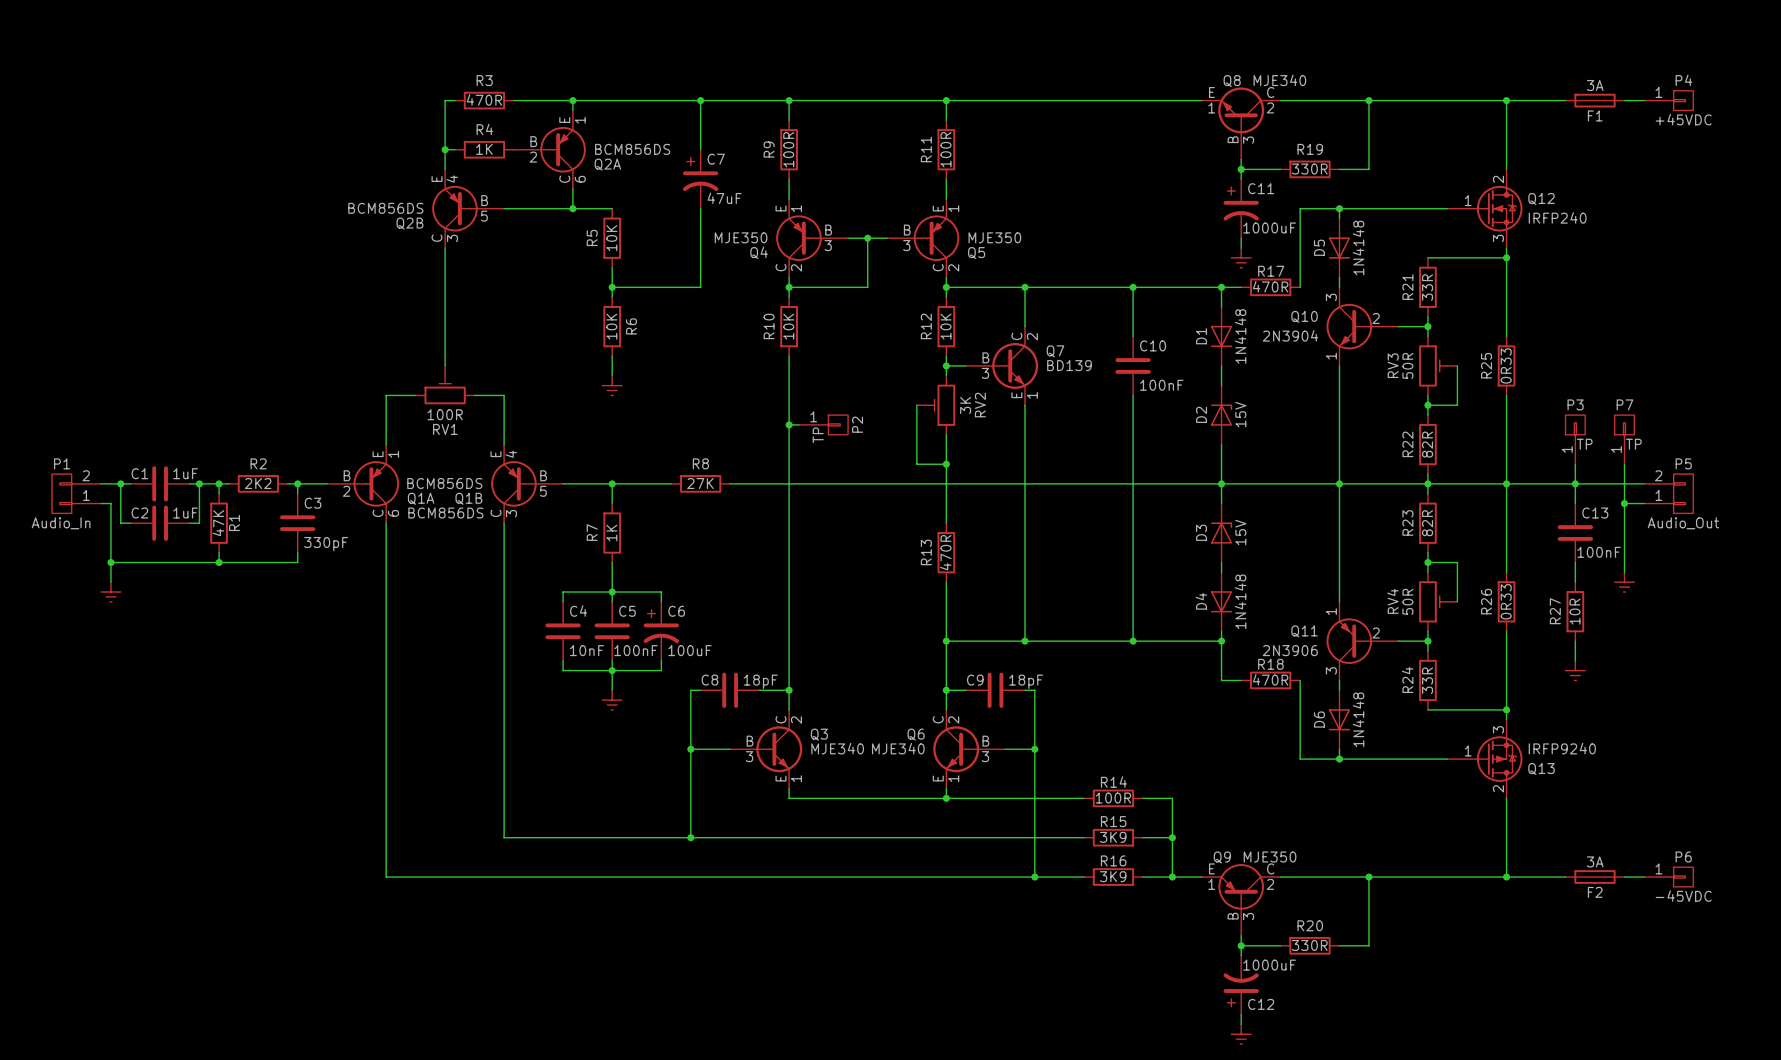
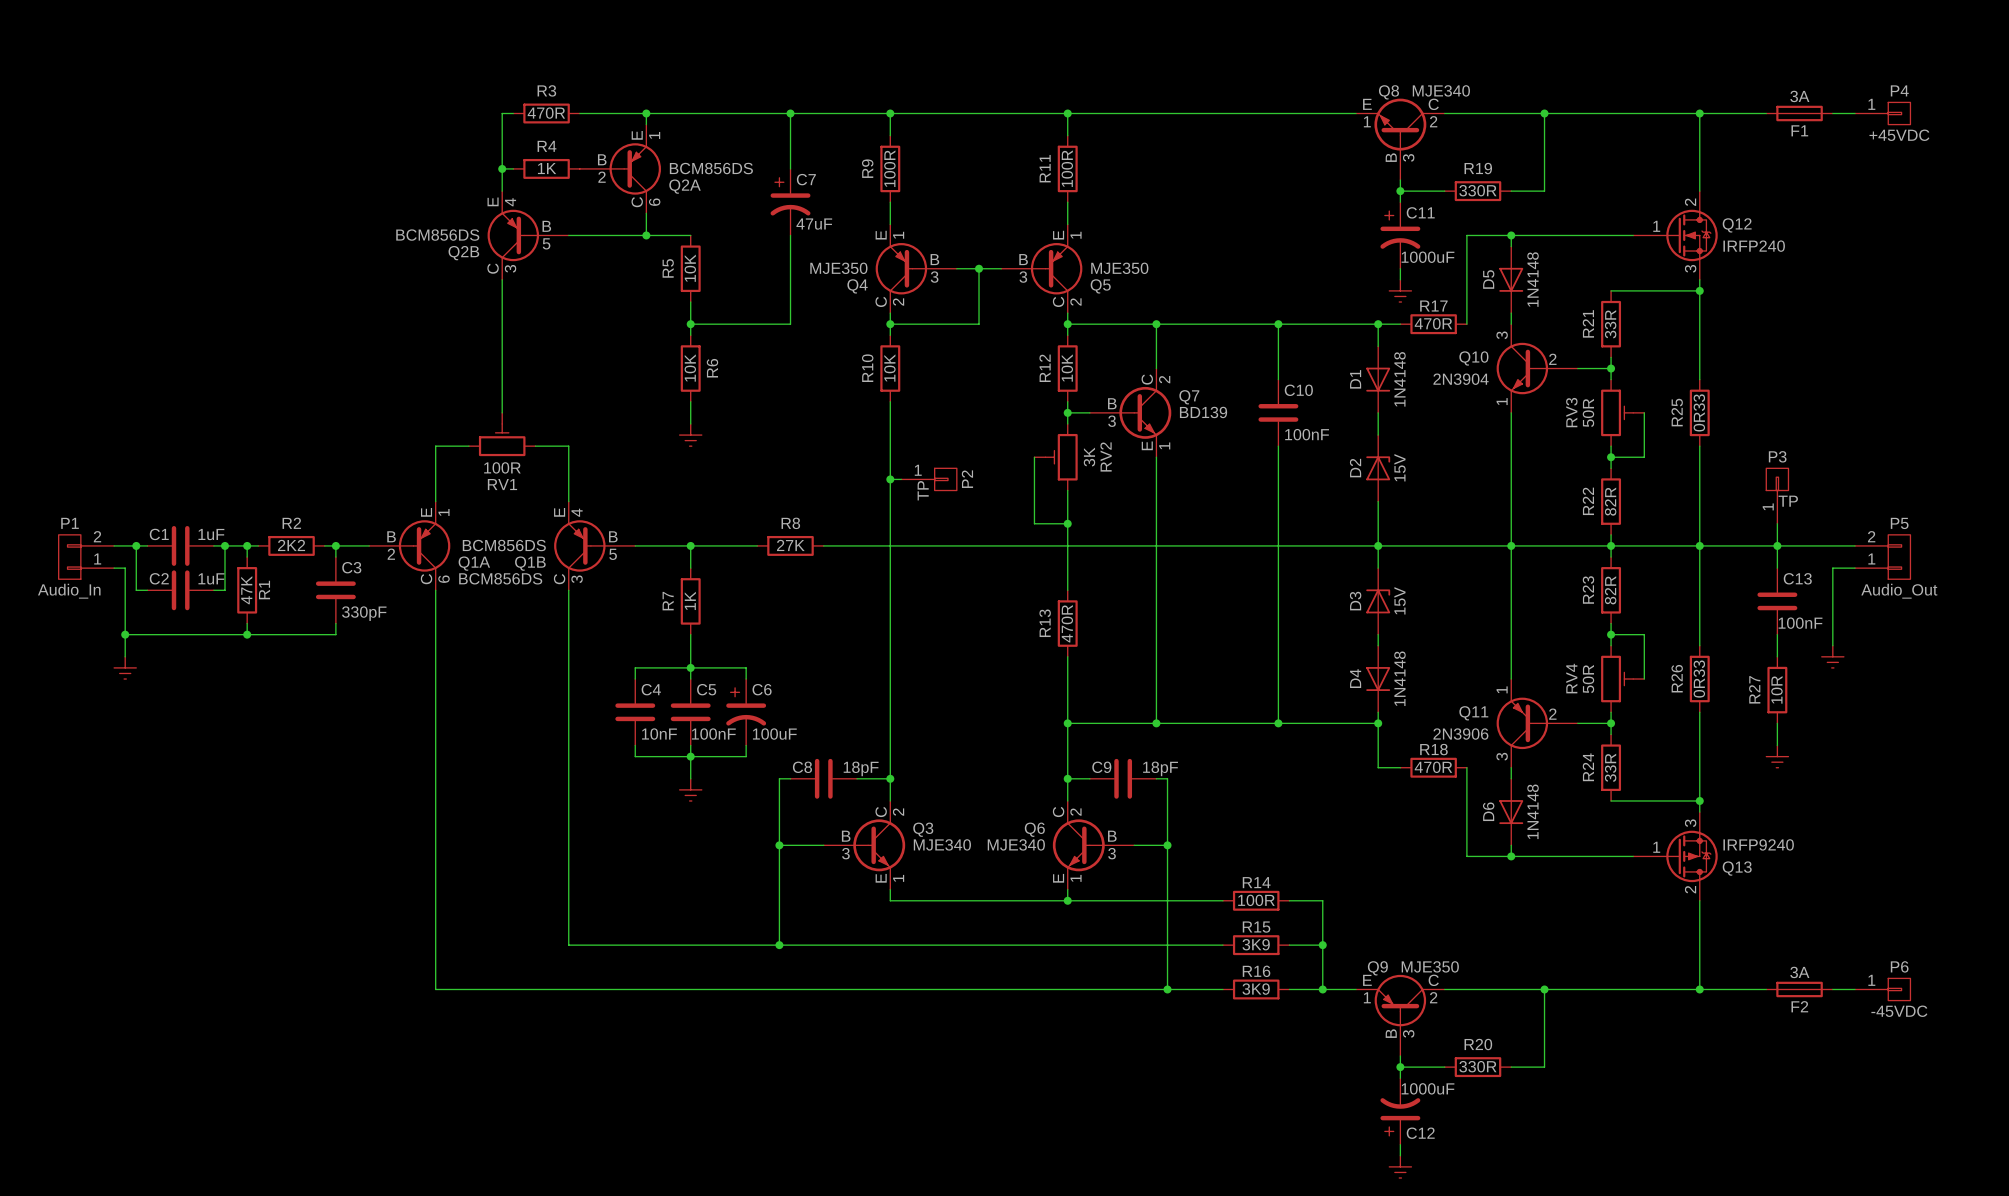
P7: TP (1624, 439) -> none
wire: (1624, 464) (1624, 503) -> none
junction: (1624, 503) -> none

